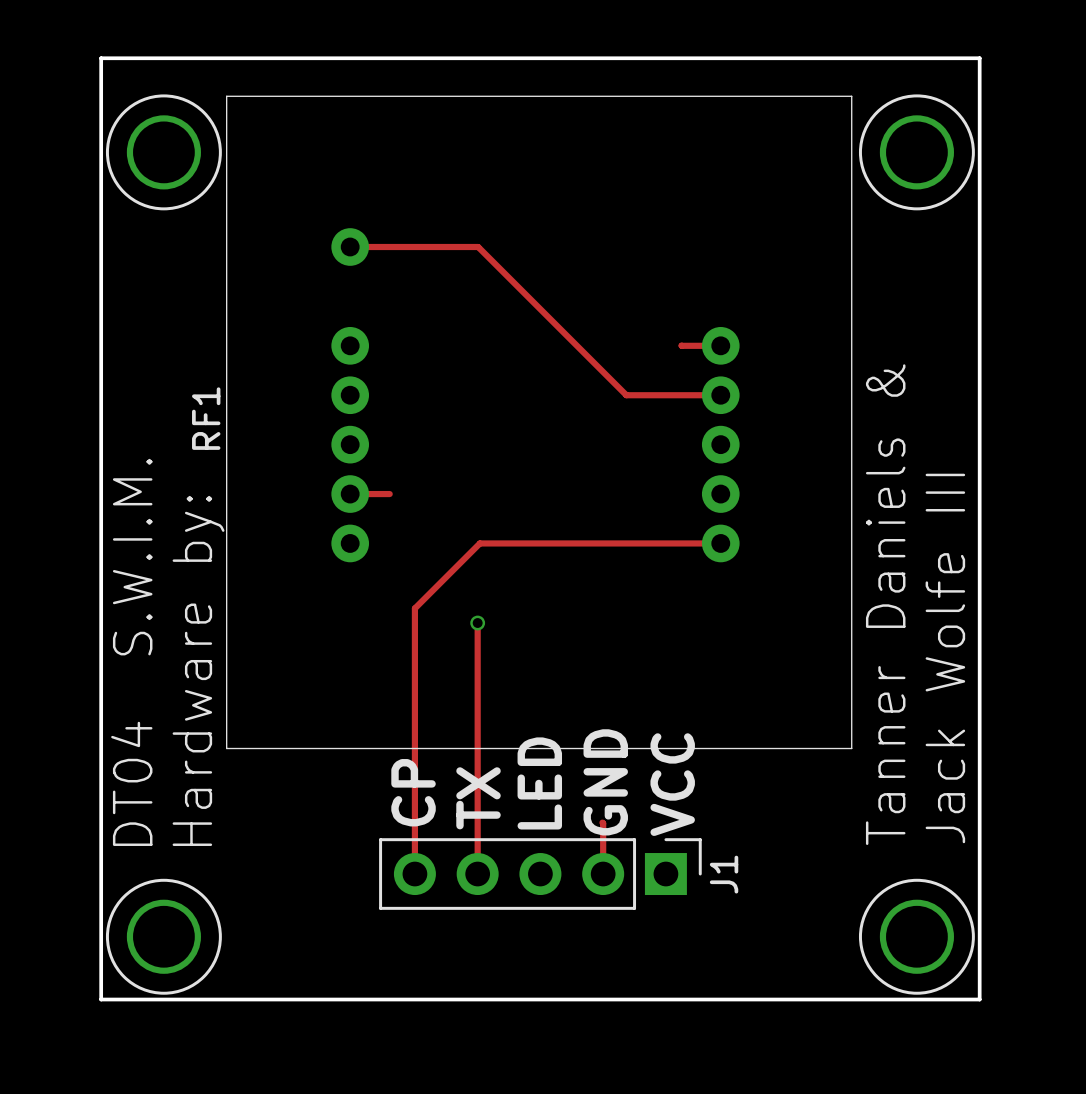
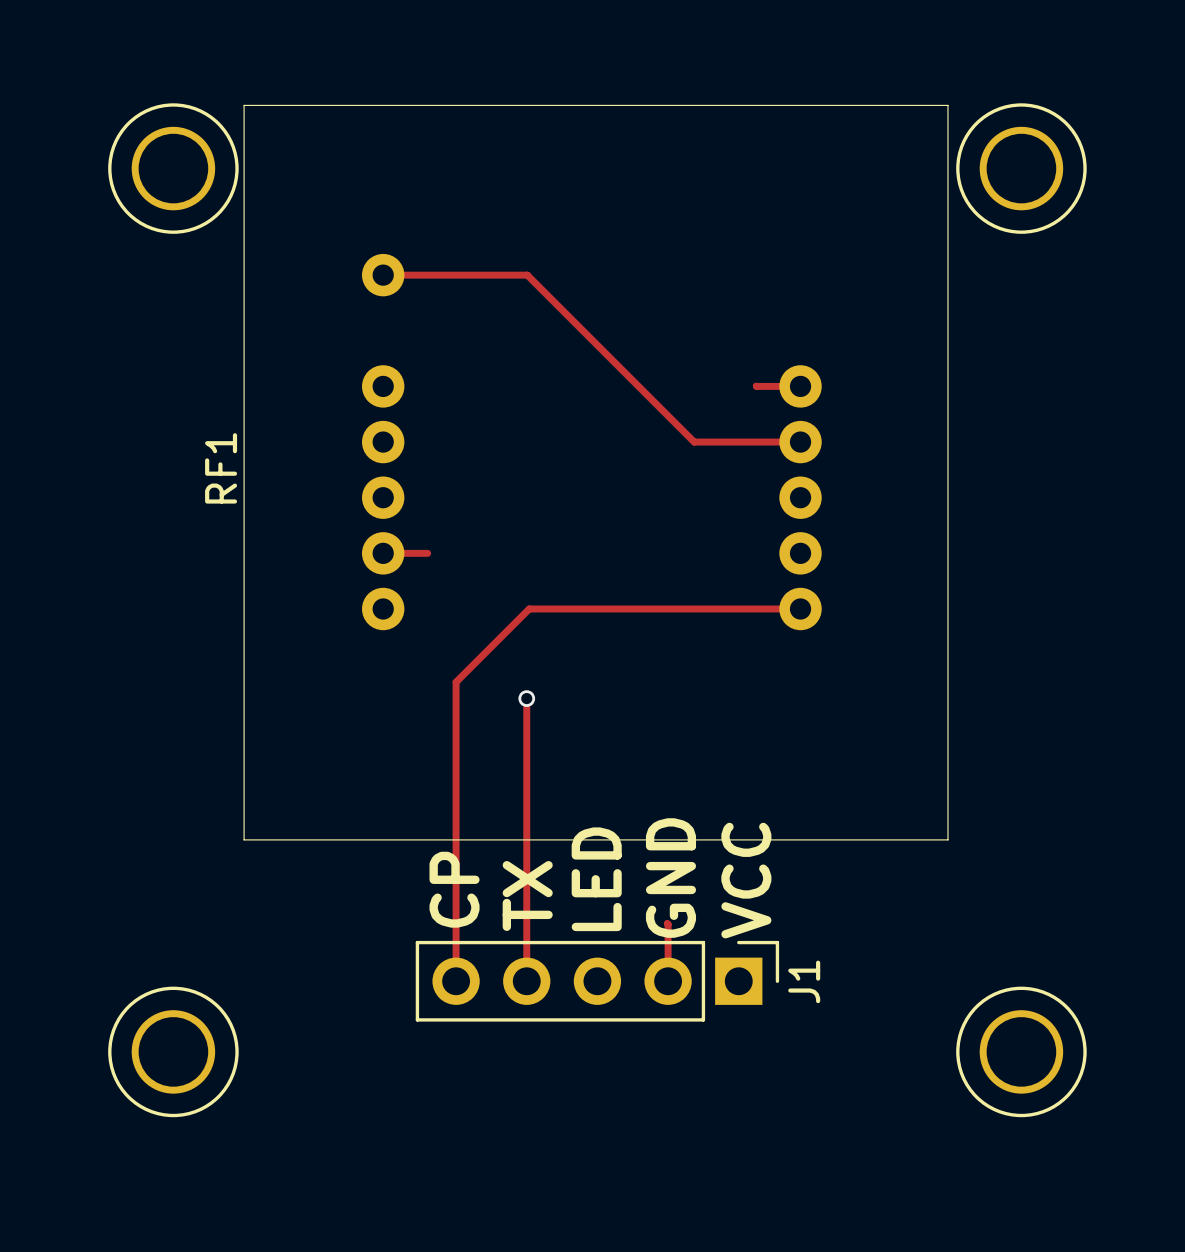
board edge: (101, 58) (101, 999) (979, 999) (979, 58) (101, 58) -> none
text: Tanner Daniels & (885, 604) -> none
text: DT04 S.W.I.M. (131, 652) -> none
text: Jack Wolfe III (945, 658) -> none
text: Hardware by: (198, 670) -> none

